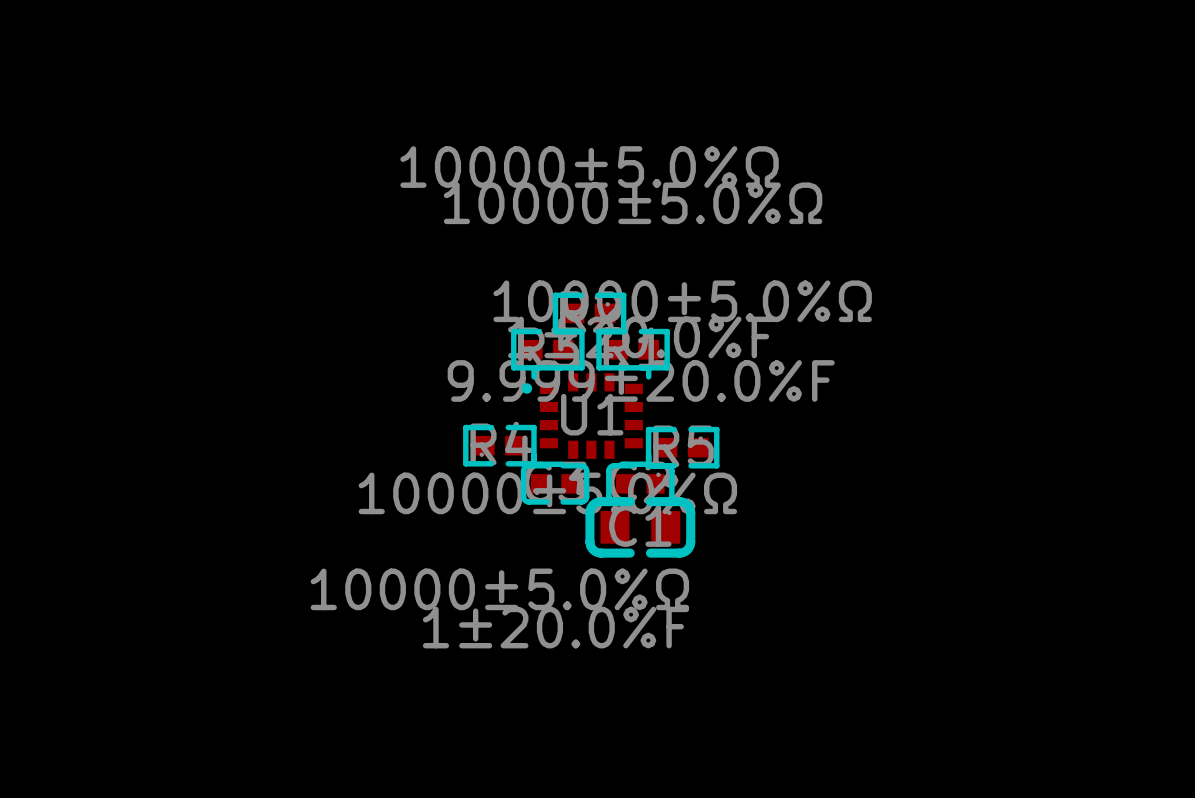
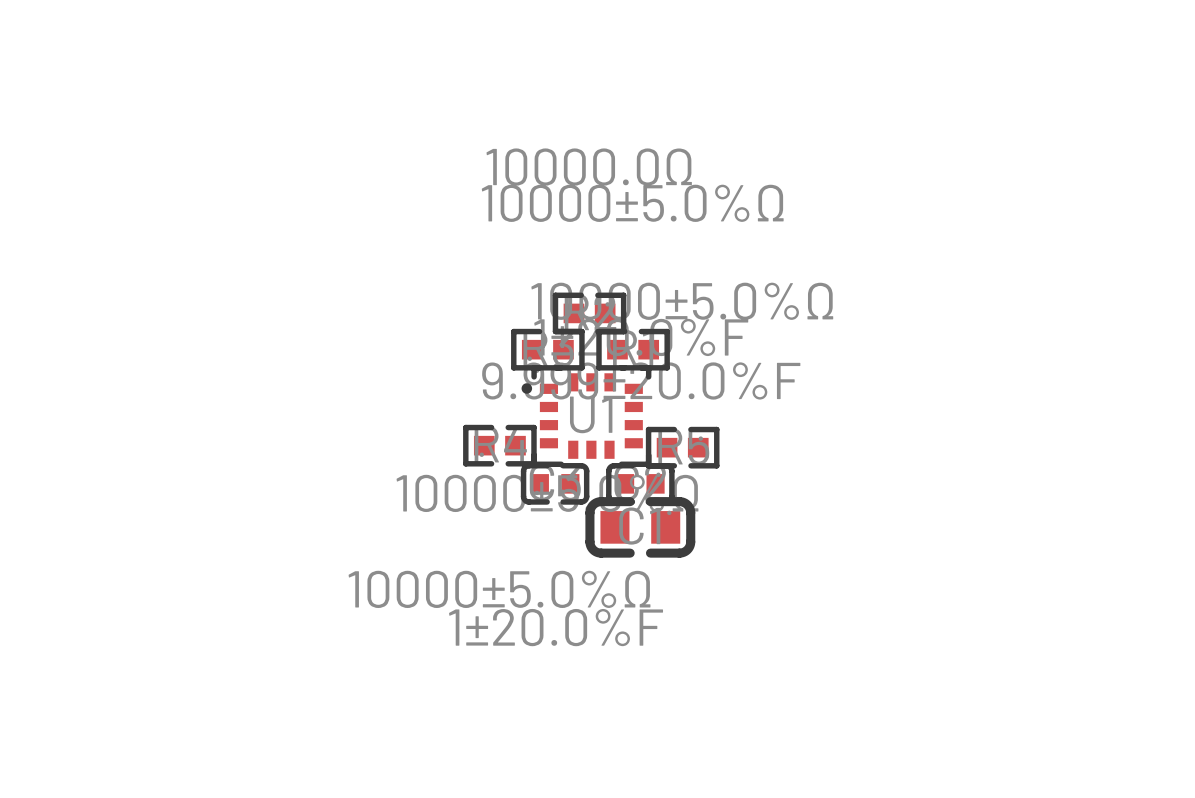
part value: 10000±5.0%Ω (589, 167) -> 10000.0Ω (589, 167)

